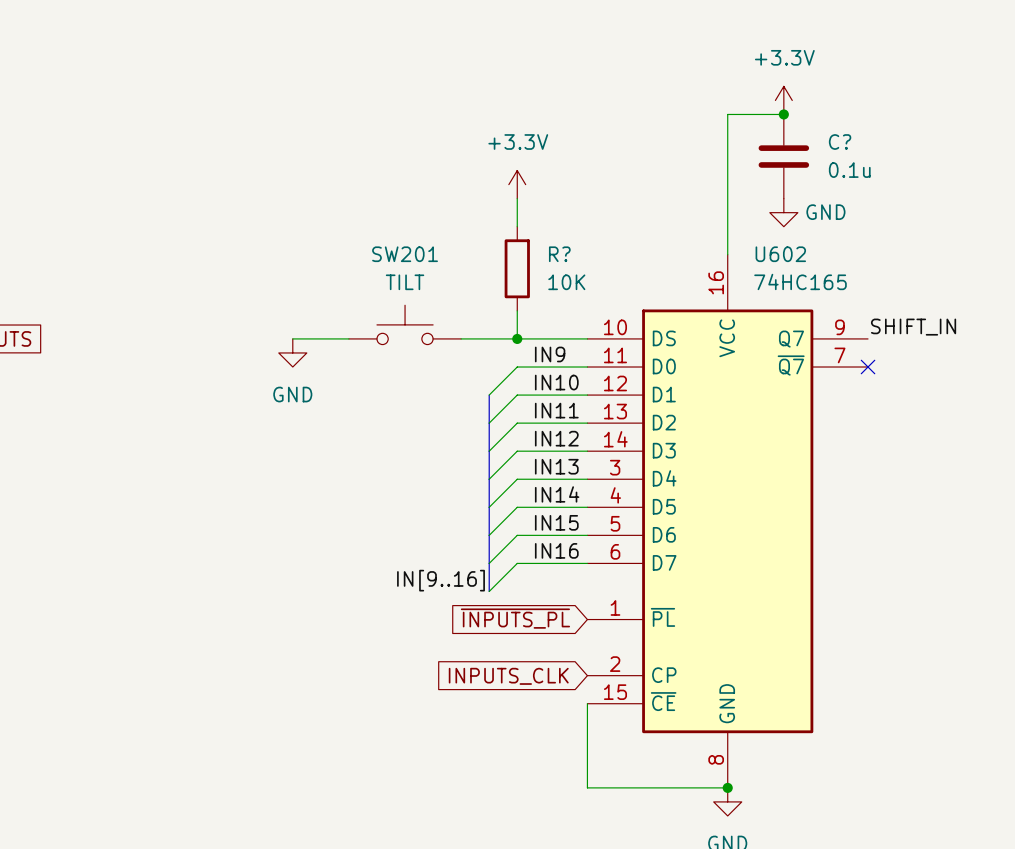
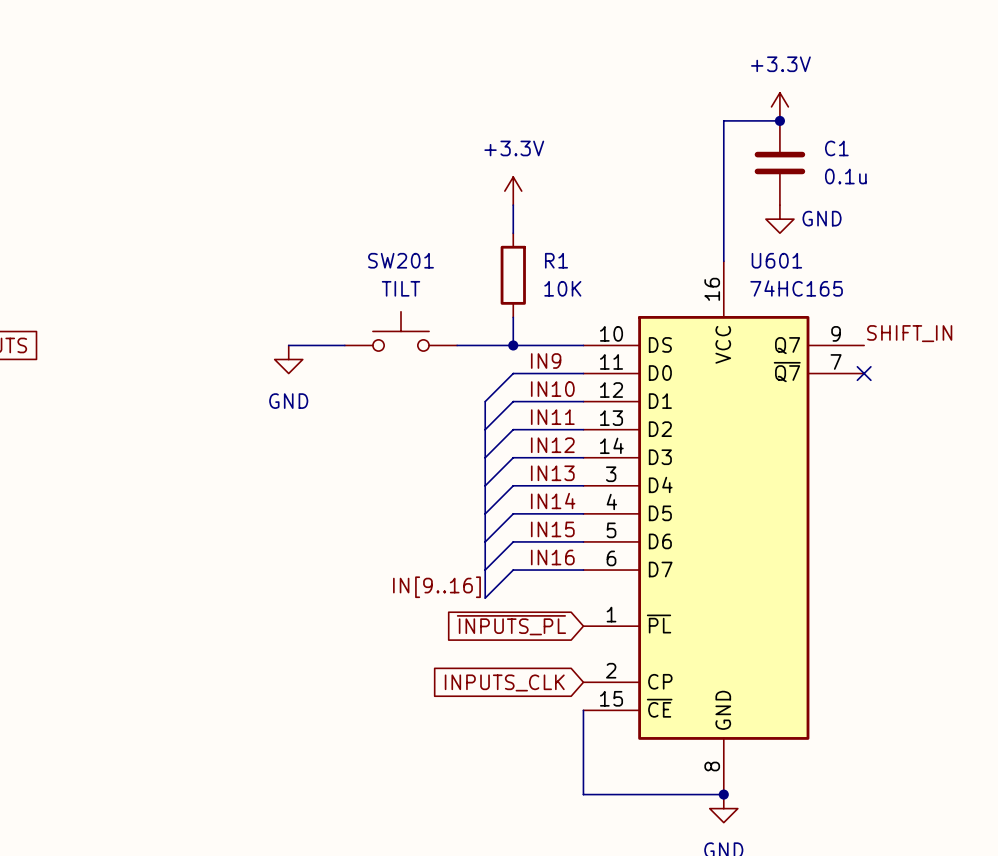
C? name: C? (840, 142) -> C1 (836, 148)
R? name: R? (559, 254) -> R1 (556, 260)
U602 name: U602 (780, 254) -> U601 (776, 260)

